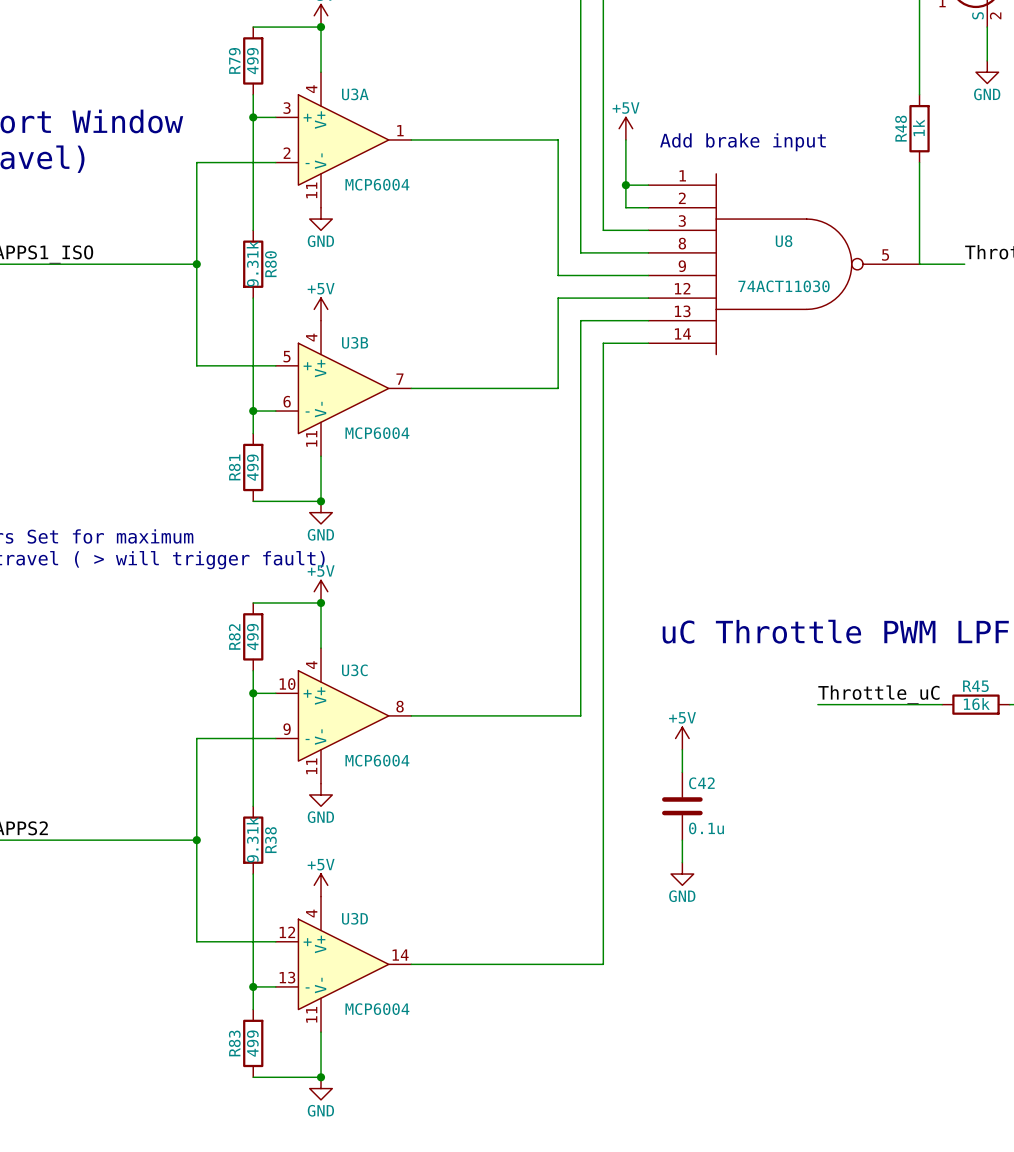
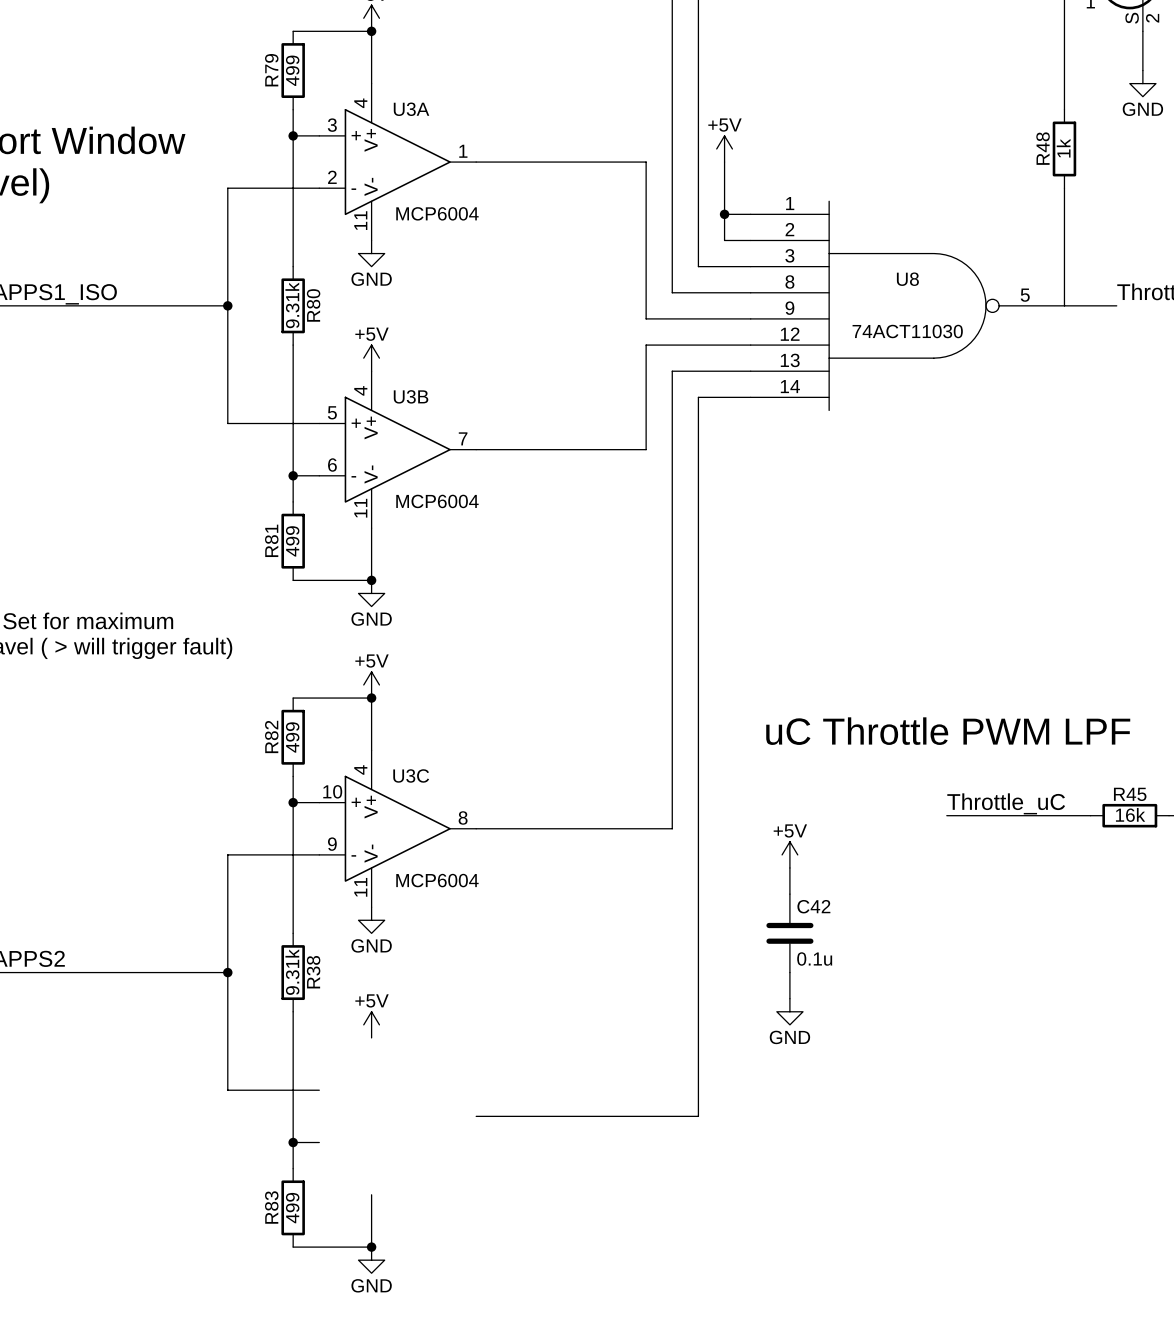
text: Add brake input (742, 142) -> none
U3D: MCP6004 (343, 964) -> none

